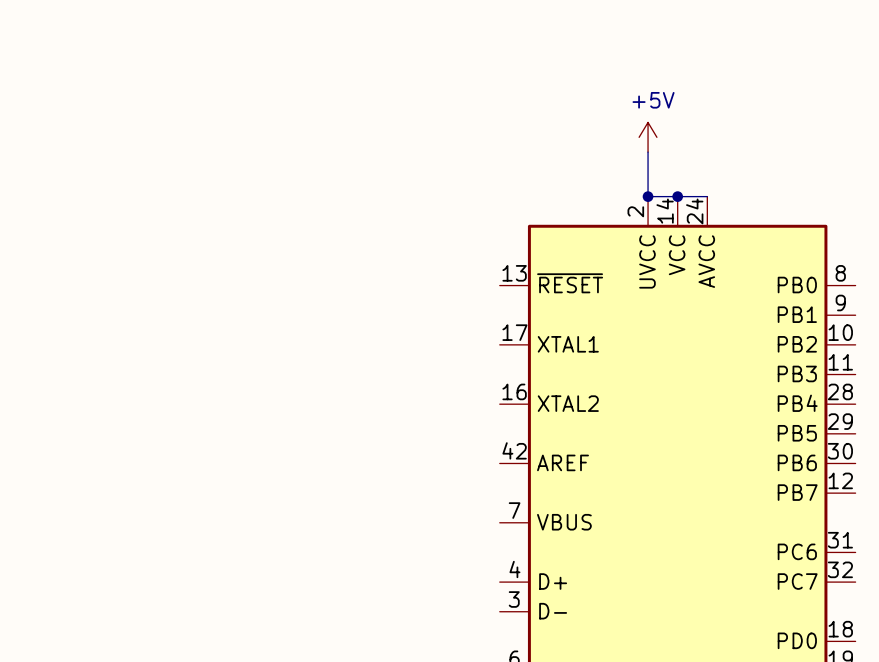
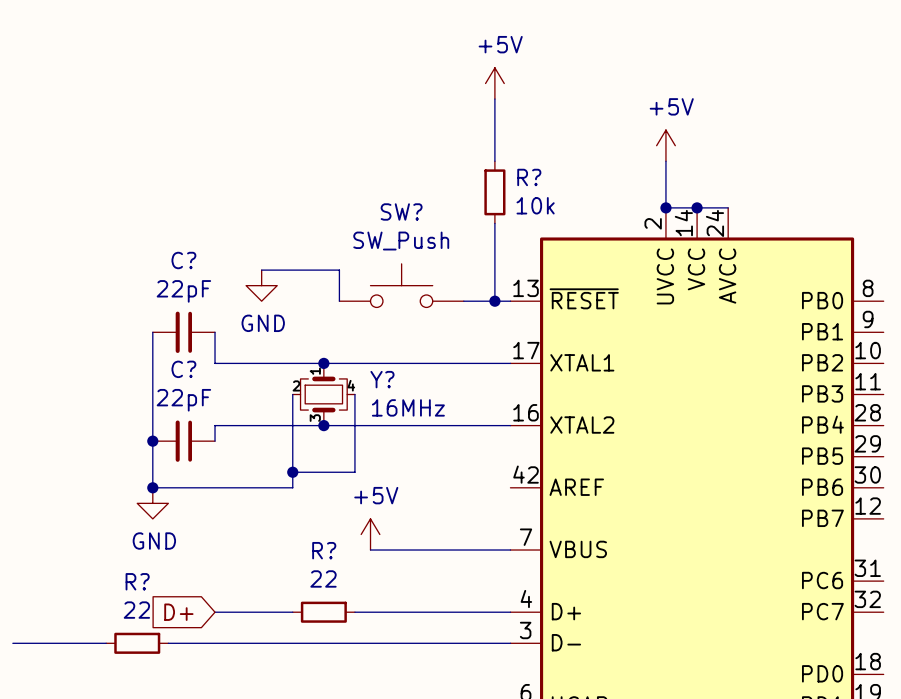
power symbol: none -> +5V (494, 83)
wire: none -> (494, 99) (494, 161)
R?: none -> 10k (494, 192)
wire: none -> (494, 223) (494, 301)
wire: none -> (261, 270) (339, 270) (339, 301)
power symbol: none -> GND (261, 285)
SW?: none -> SW_Push (401, 285)
wire: none -> (463, 301) (510, 301)
junction: none -> (494, 301)
wire: none -> (152, 332) (152, 487) (292, 487) (292, 394)
C?: none -> 22pF (183, 332)
wire: none -> (215, 332) (215, 363) (510, 363)
junction: none -> (323, 363)
Y?: none -> 16MHz (323, 394)
wire: none -> (354, 394) (354, 472) (292, 472)
junction: none -> (323, 425)
wire: none -> (510, 425) (215, 425) (215, 441)
junction: none -> (152, 441)
C?: none -> 22pF (183, 441)
junction: none -> (292, 472)
junction: none -> (152, 487)
power symbol: none -> GND (152, 503)
power symbol: none -> +5V (370, 534)
wire: none -> (370, 550) (510, 550)
global label: none -> D+ (178, 612)
wire: none -> (215, 612) (292, 612)
R?: none -> 22 (323, 612)
wire: none -> (354, 612) (510, 612)
wire: none -> (12, 643) (106, 643)
R?: none -> 22 (137, 643)
wire: none -> (168, 643) (510, 643)

